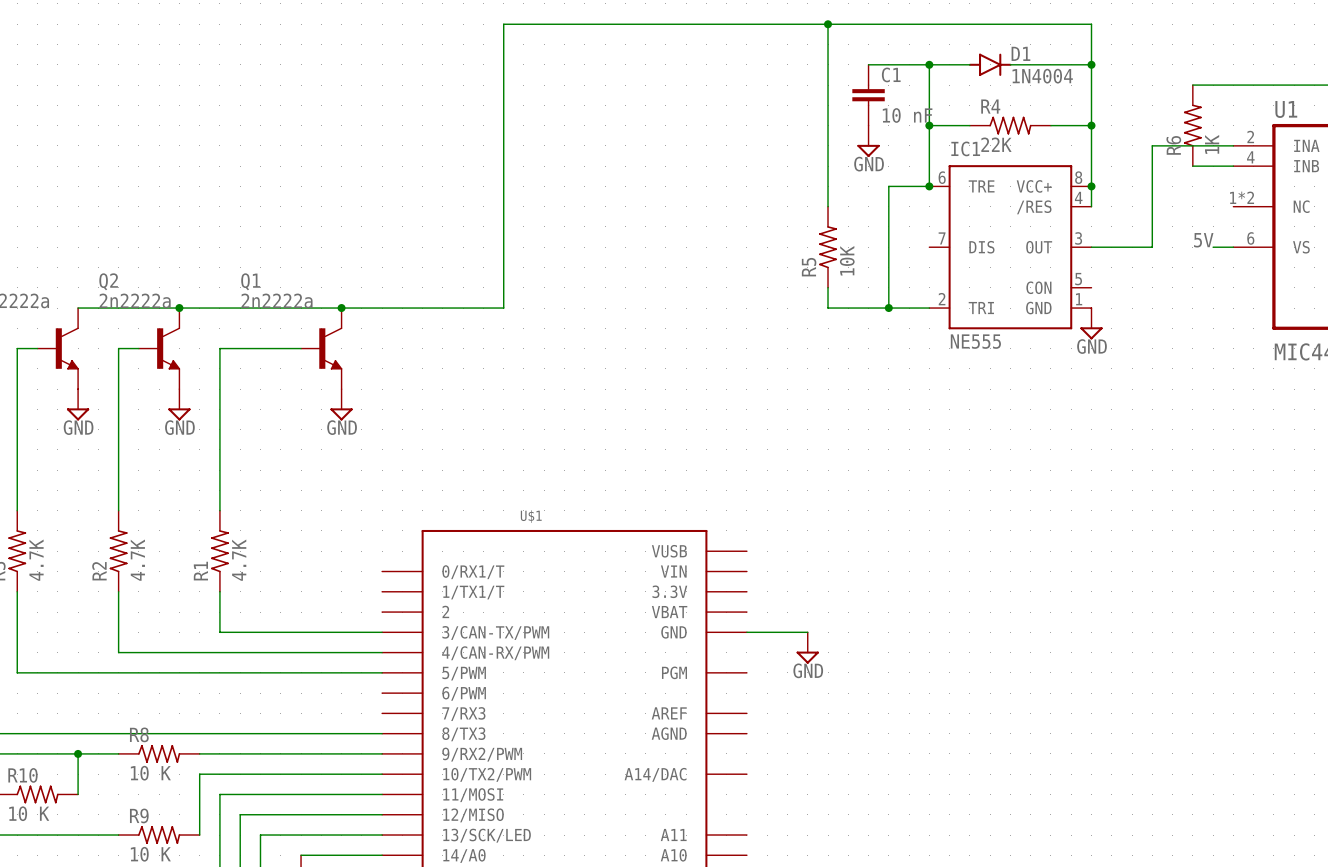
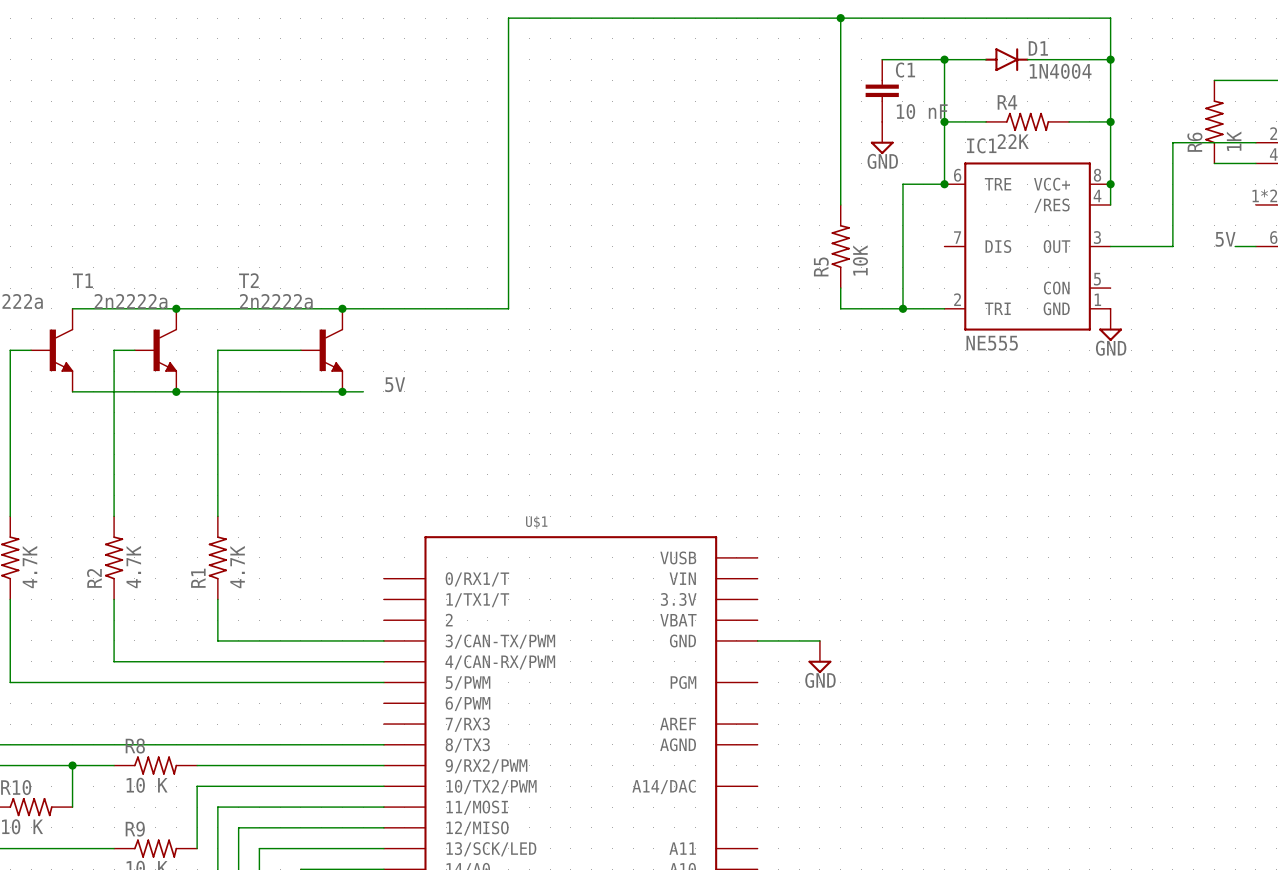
Q2 name: Q2 (108, 281) -> T1 (82, 280)
Q1 name: Q1 (250, 281) -> T2 (248, 280)
label: none -> 5V (395, 384)
wire: none -> (72, 391) (363, 391)
junction: none -> (176, 391)
junction: none -> (342, 391)
power symbol: GND (78, 404) -> none
power symbol: GND (179, 404) -> none
power symbol: GND (341, 404) -> none

